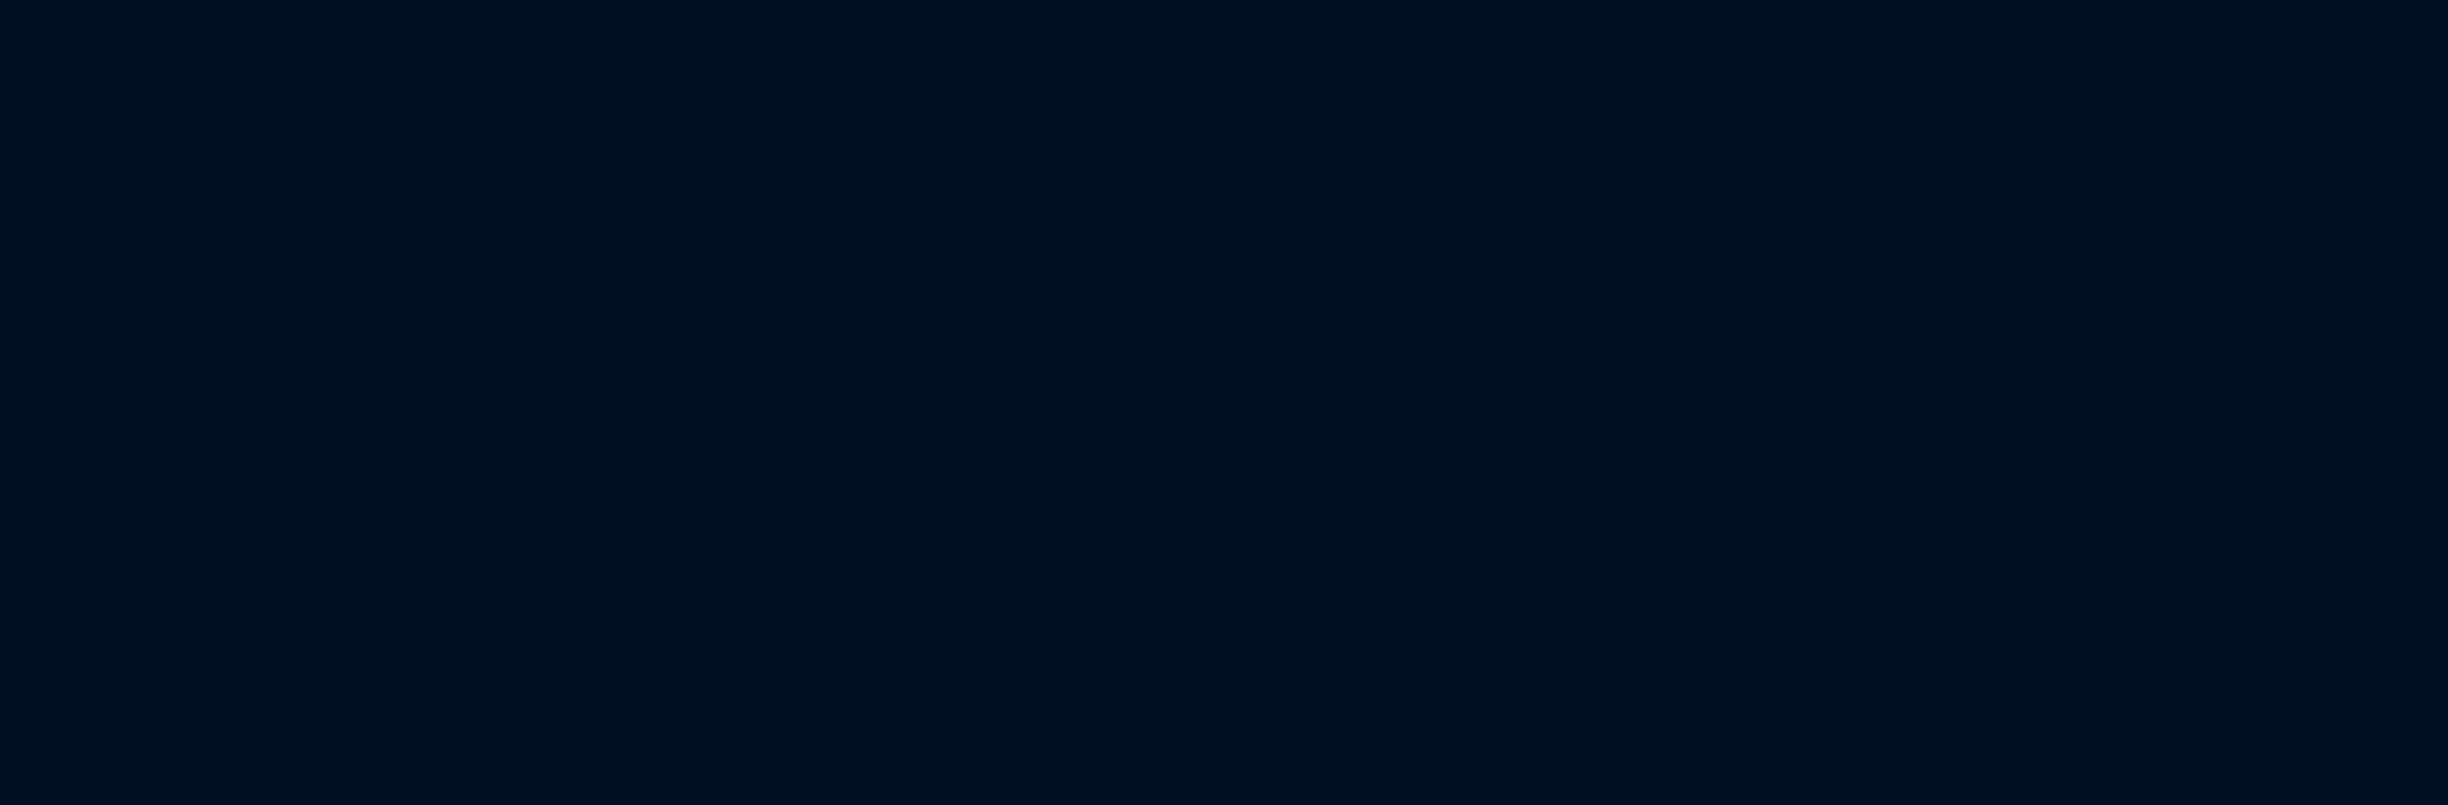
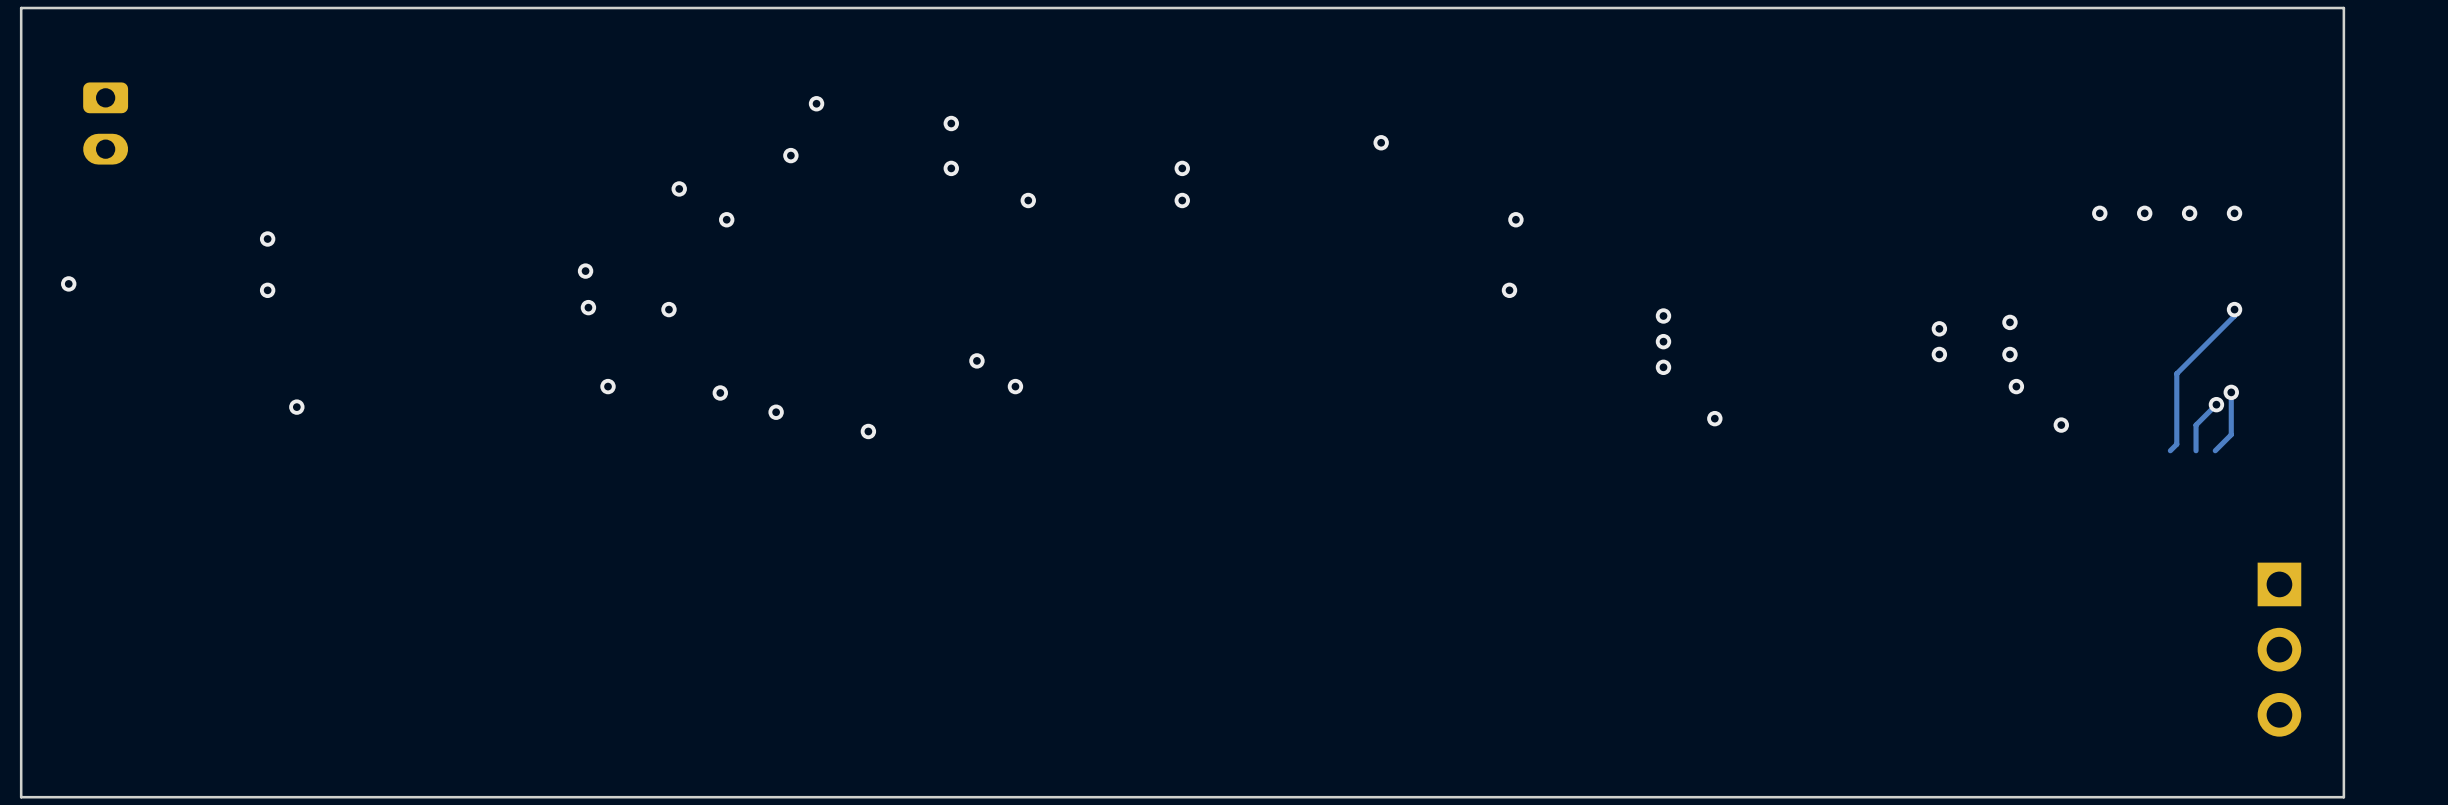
board edge: none -> (2343, 8) (21, 8) (21, 797) (2343, 797) (2343, 8)
via: none -> (816, 103)
part: none -> (105, 123)
via: none -> (951, 123)
via: none -> (1381, 142)
via: none -> (790, 155)
via: none -> (951, 168)
via: none -> (1182, 168)
via: none -> (679, 188)
via: none -> (1028, 200)
via: none -> (1182, 200)
via: none -> (2099, 213)
via: none -> (2144, 213)
via: none -> (2189, 213)
via: none -> (2234, 213)
via: none -> (726, 219)
via: none -> (1515, 219)
via: none -> (267, 239)
via: none -> (585, 271)
via: none -> (68, 283)
via: none -> (267, 290)
via: none -> (1509, 290)
via: none -> (588, 307)
via: none -> (668, 309)
track: none -> (2234, 309) (2234, 315) (2176, 373) (2176, 444) (2170, 450)
via: none -> (2234, 309)
via: none -> (1663, 315)
via: none -> (2009, 322)
via: none -> (1939, 328)
via: none -> (1663, 341)
via: none -> (1939, 354)
via: none -> (2009, 354)
via: none -> (976, 360)
via: none -> (1663, 367)
via: none -> (608, 386)
via: none -> (1015, 386)
via: none -> (2016, 386)
via: none -> (720, 392)
track: none -> (2231, 392) (2231, 434) (2215, 450)
via: none -> (2231, 392)
track: none -> (2216, 404) (2196, 425) (2196, 450)
via: none -> (2216, 404)
via: none -> (296, 407)
via: none -> (776, 412)
via: none -> (1714, 418)
via: none -> (2061, 425)
via: none -> (868, 431)
part: none -> (2279, 649)

